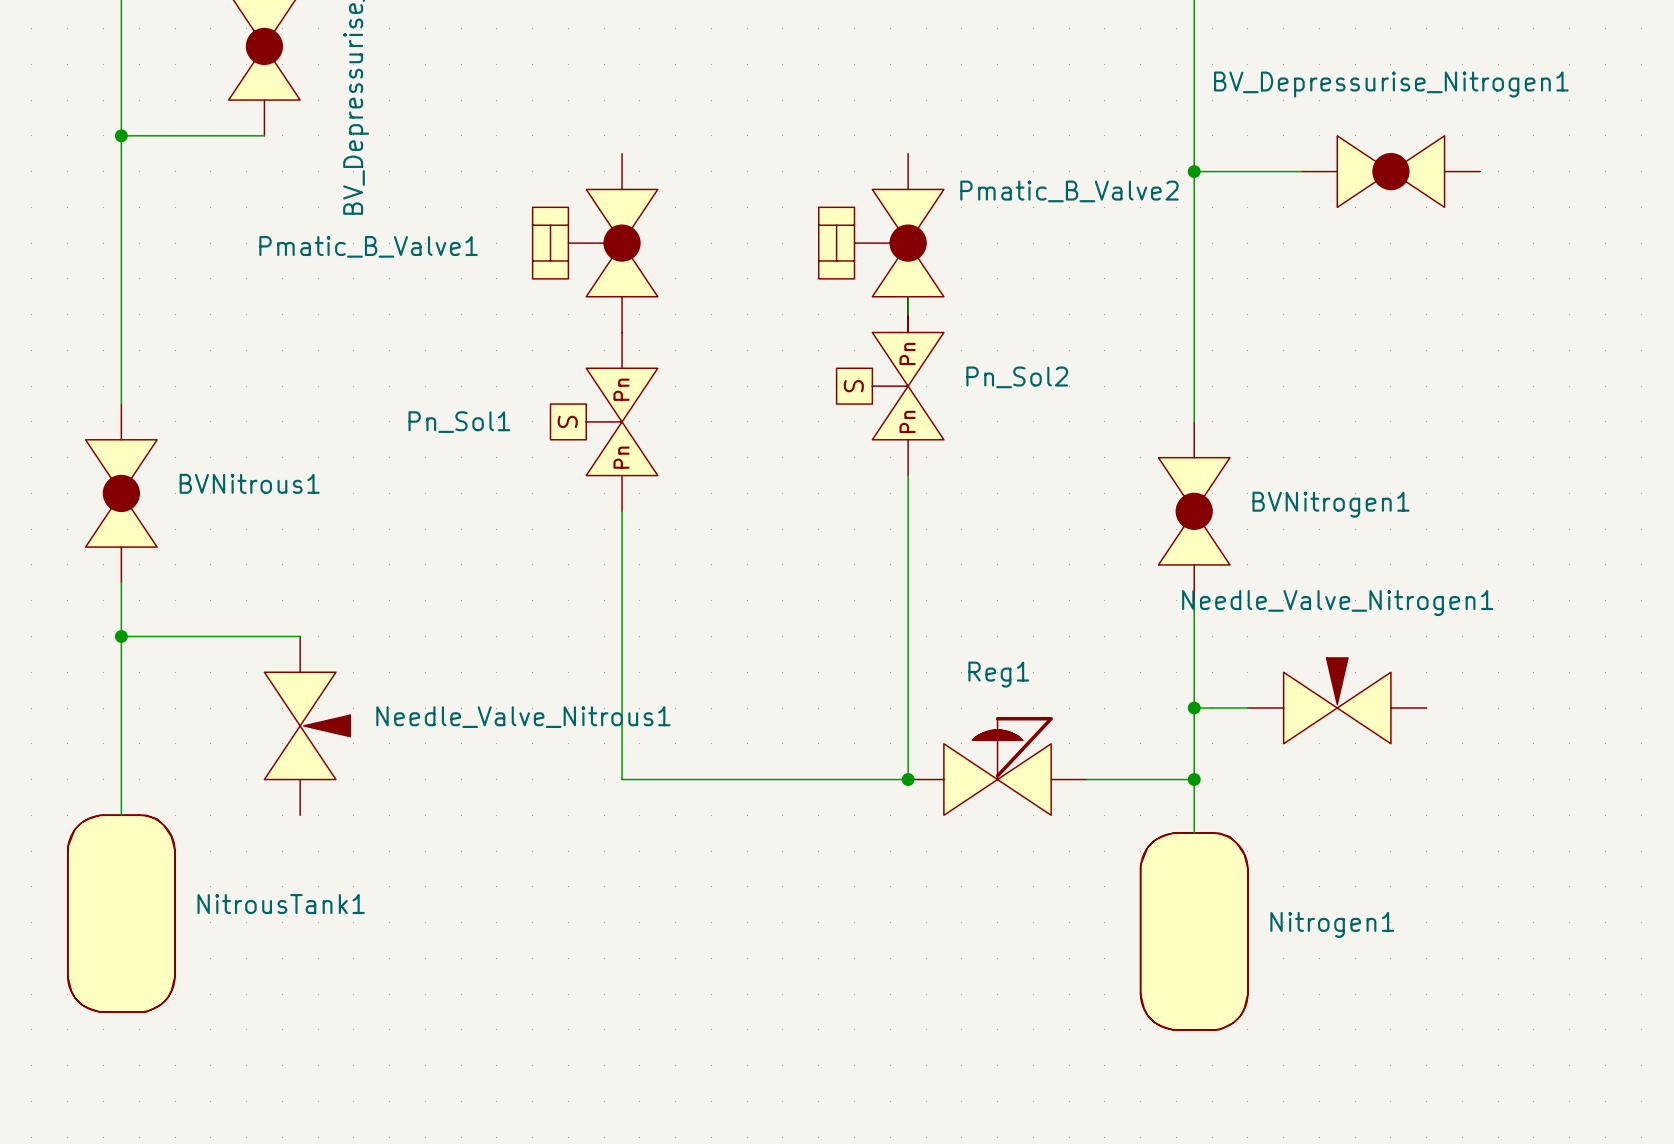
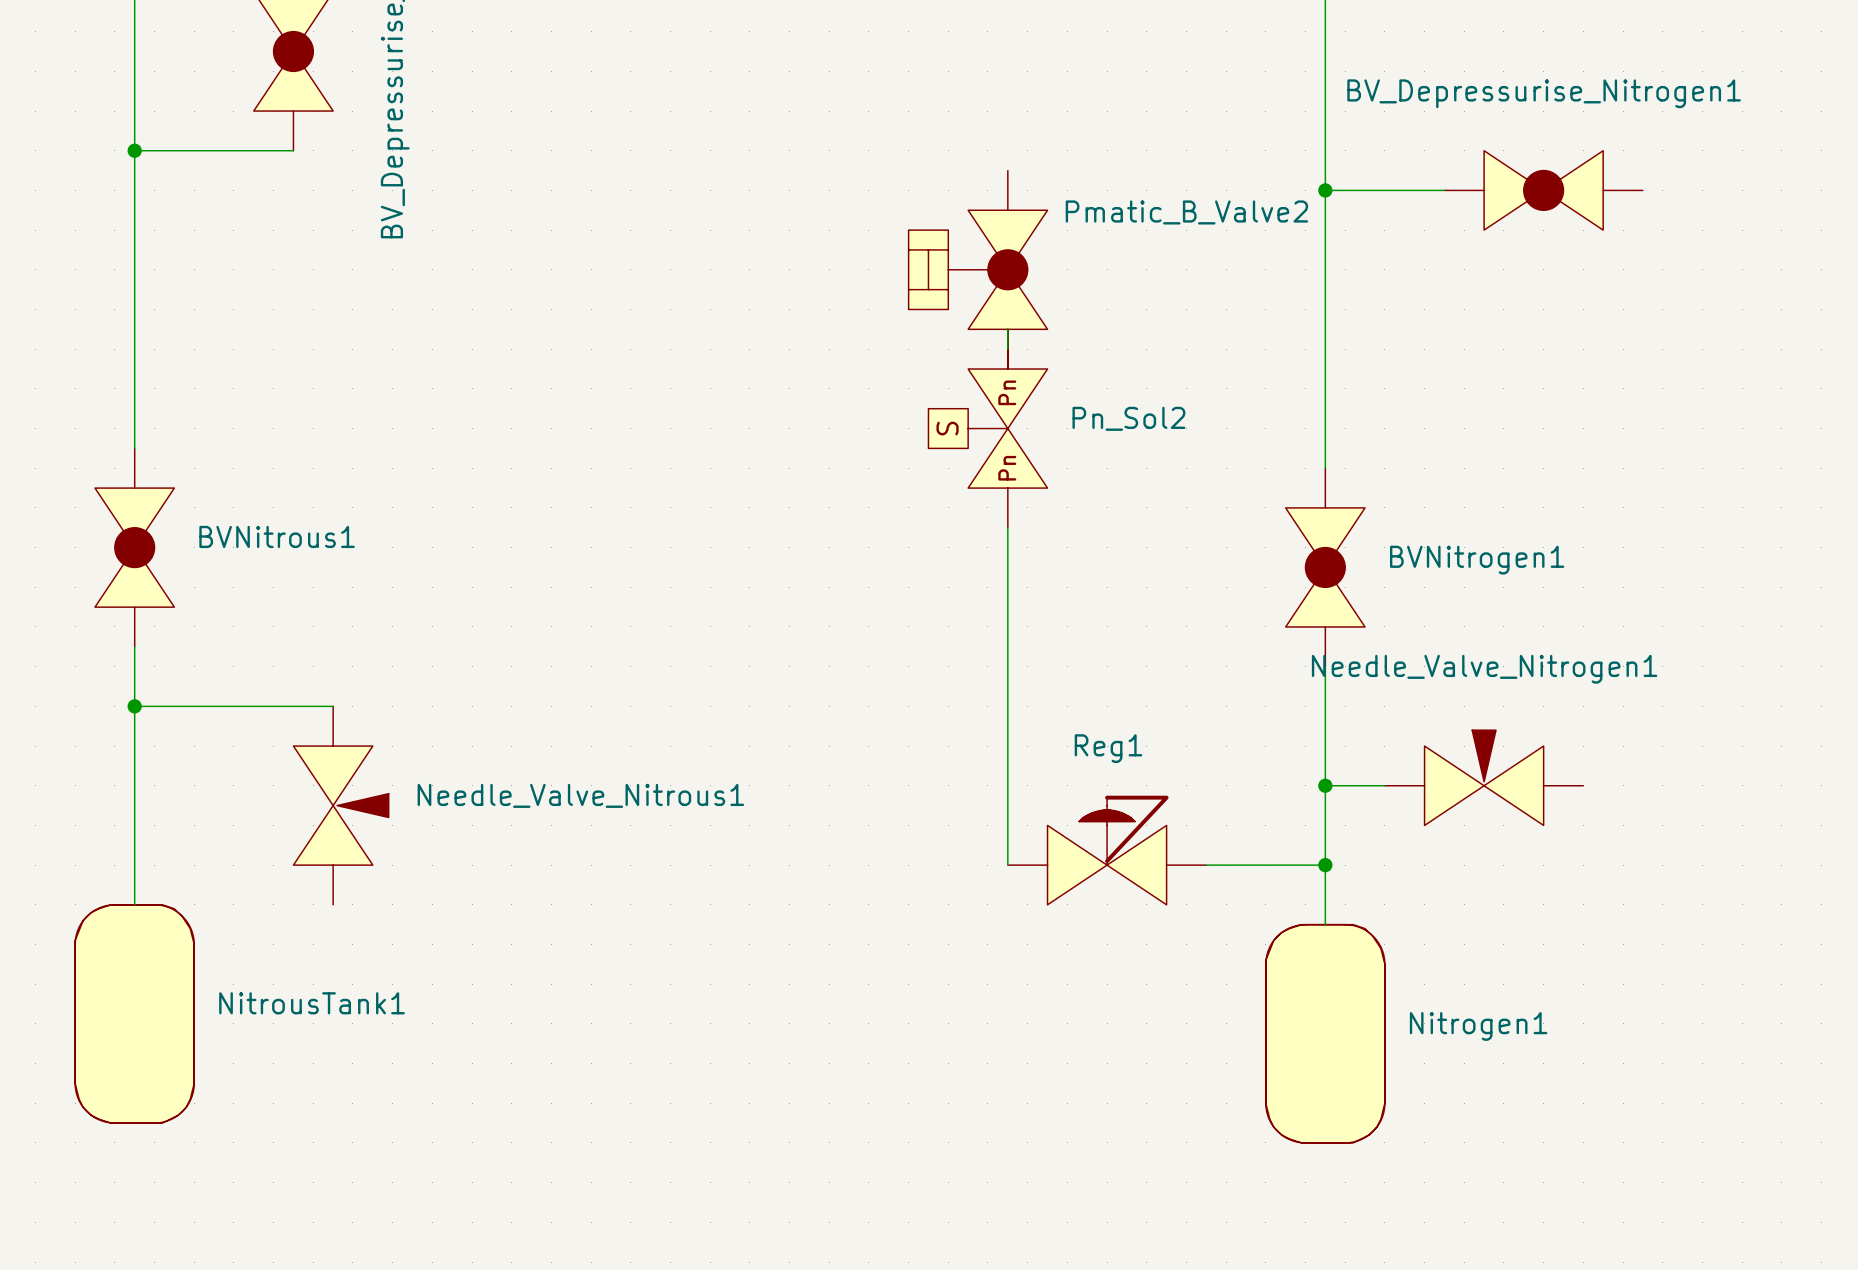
Pmatic_B_Valve1: (595, 243) -> none
Pn_Sol1: (604, 421) -> none
wire: (622, 511) (622, 779) (908, 779) -> none
junction: (908, 779) -> none

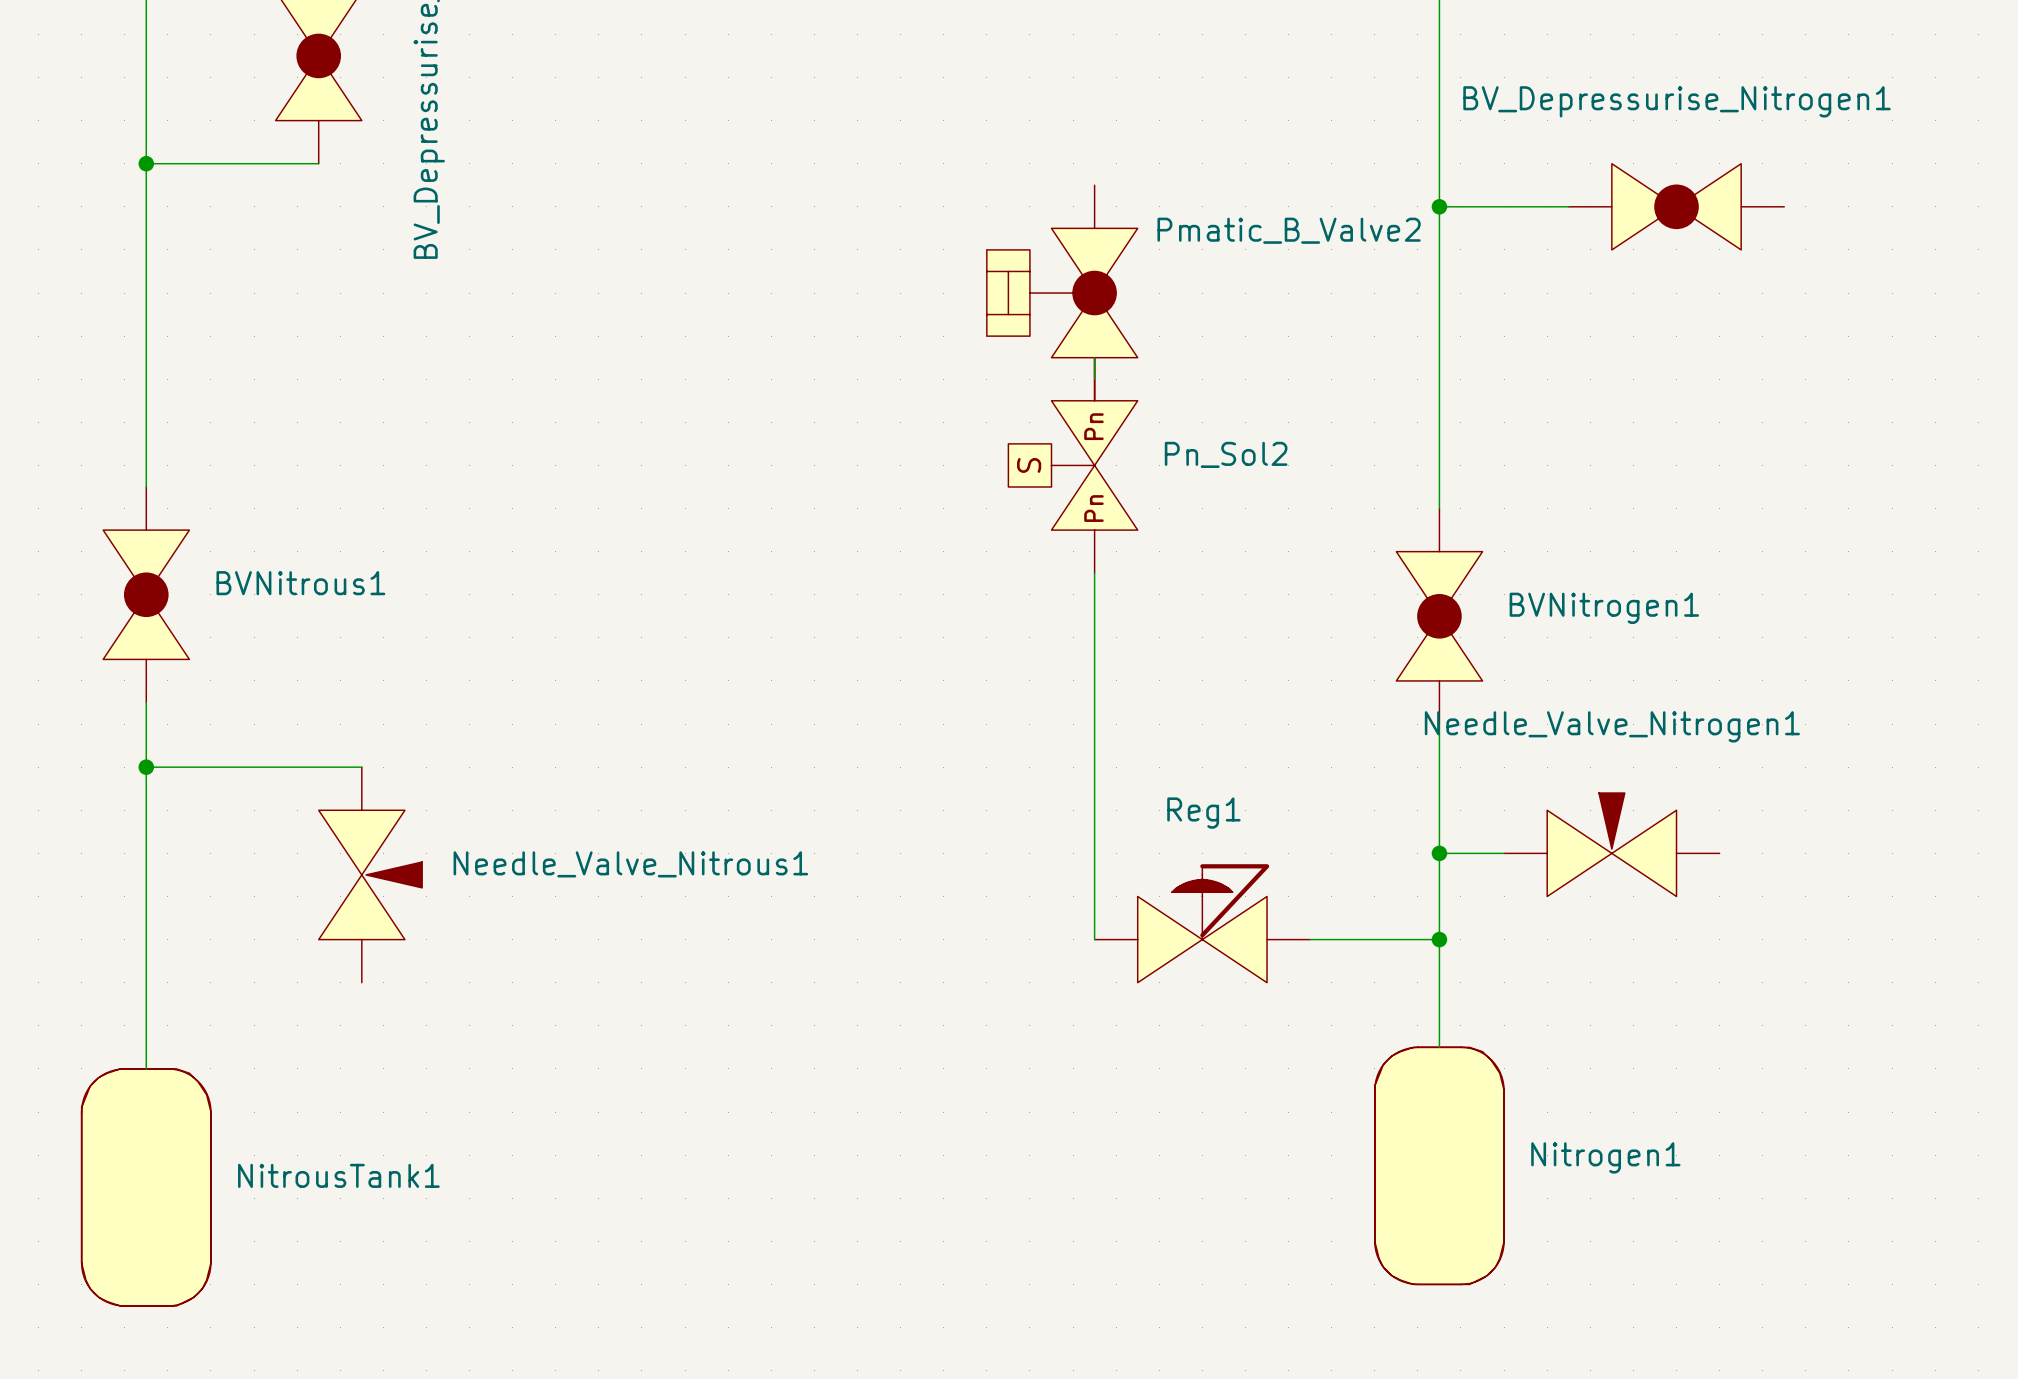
NitrousTank1 position: (134, 1013) -> (146, 1187)
Nitrogen1 position: (1325, 1033) -> (1439, 1165)

